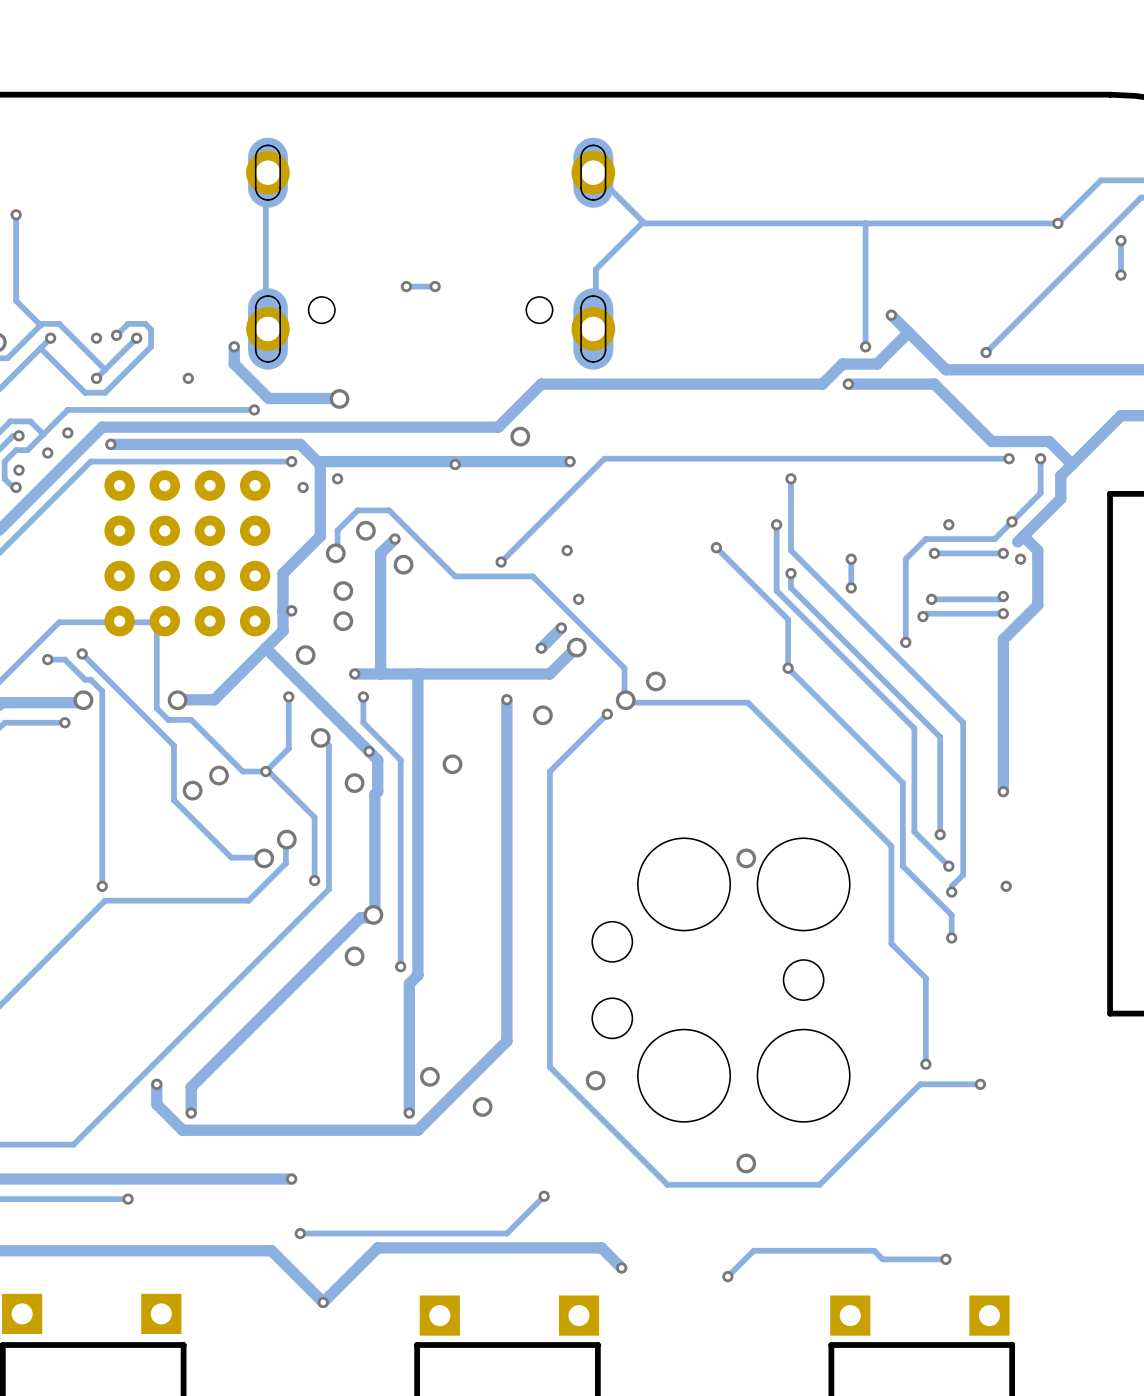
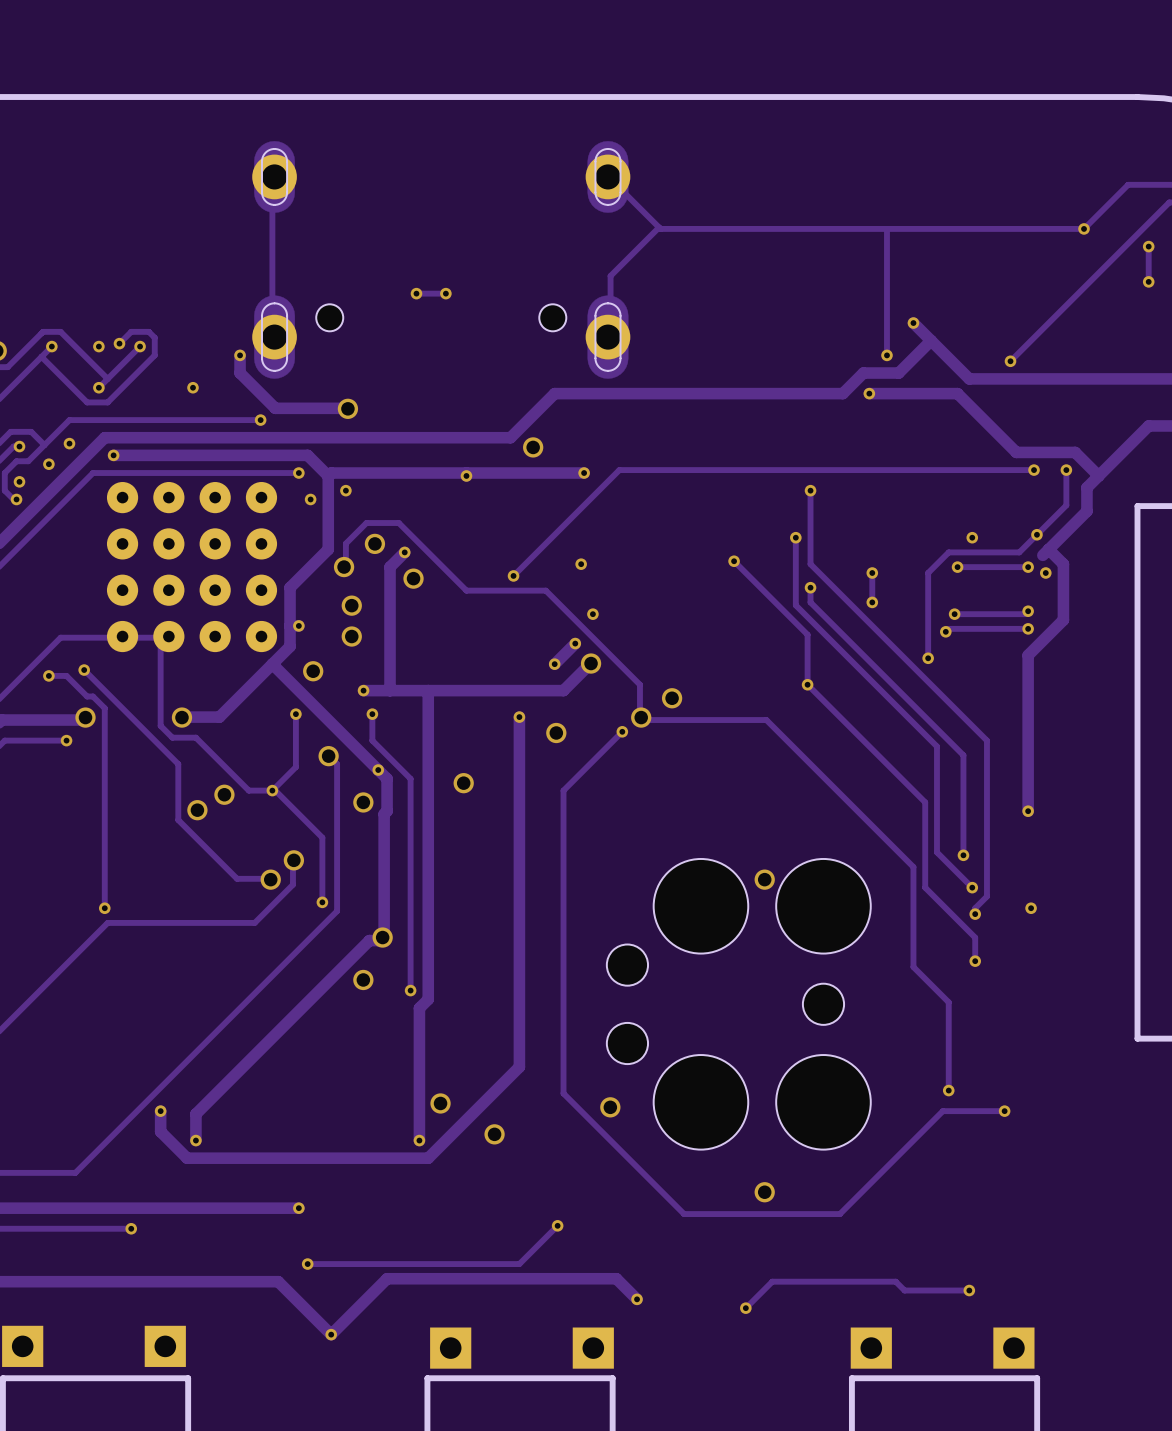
track: (16, 214) (16, 300) (40, 325) -> none
via: (16, 214) -> none

